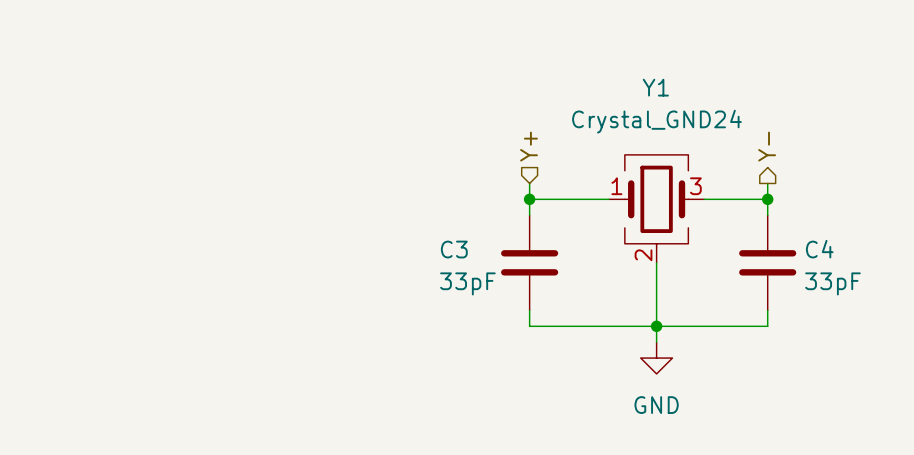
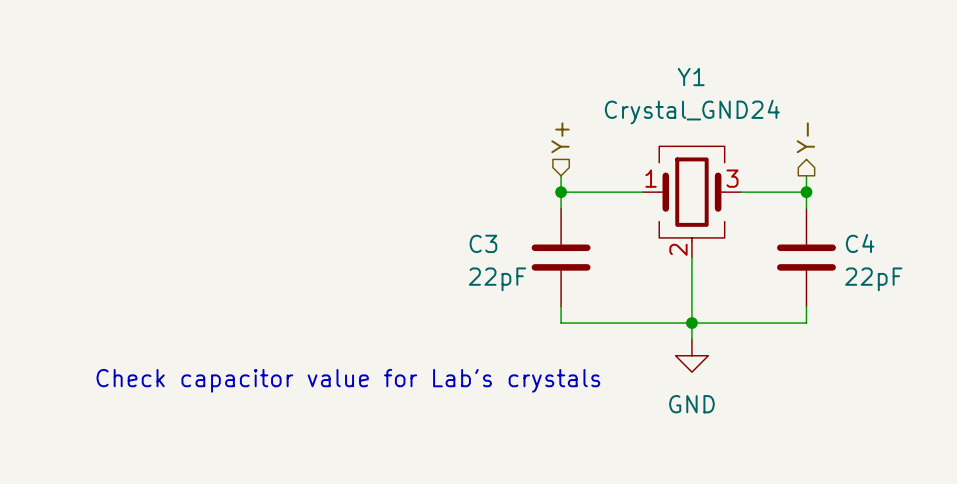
C3 value: 33pF (467, 283) -> 22pF (497, 279)
C4 value: 33pF (832, 283) -> 22pF (873, 279)
text: none -> Check capacitor value for Lab's crystals (348, 380)

